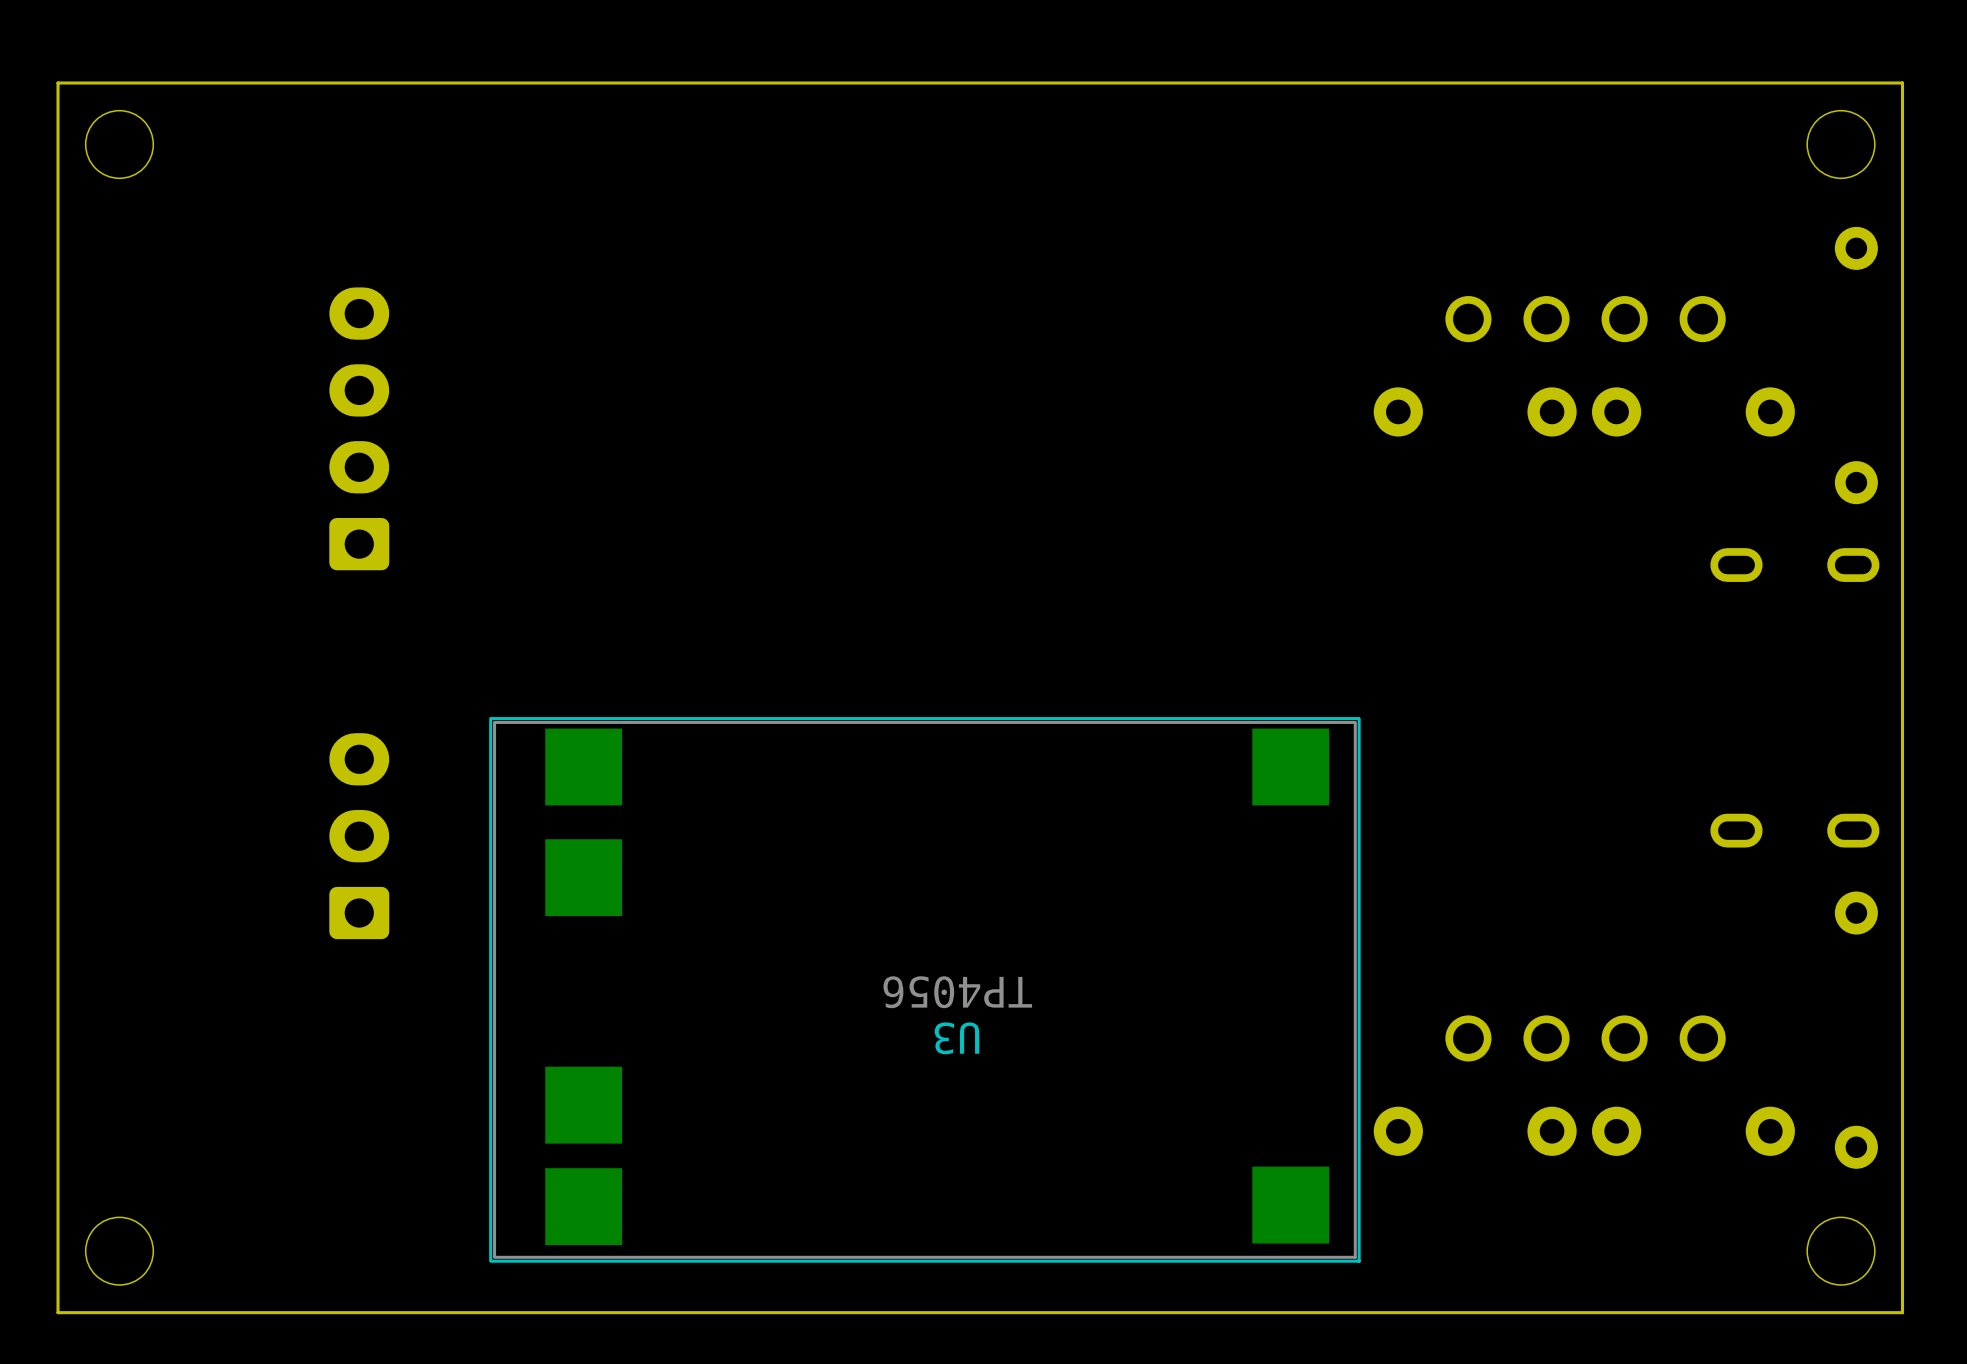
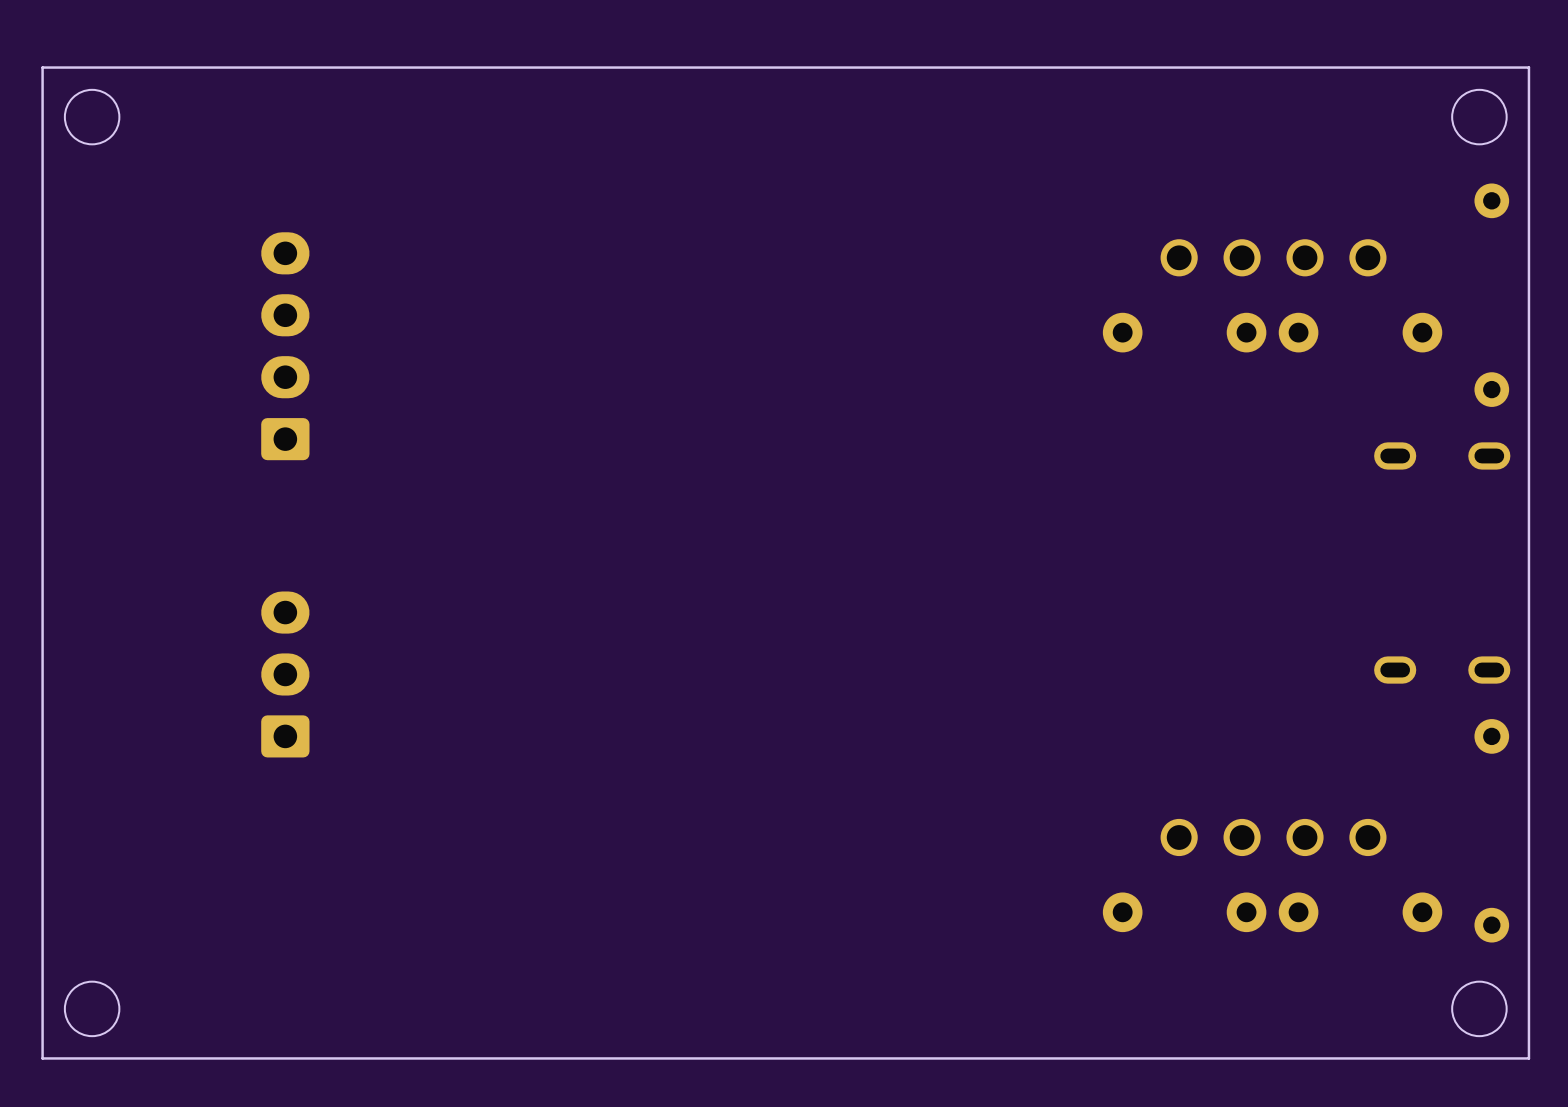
U3: TP4056 (924, 989) -> none

